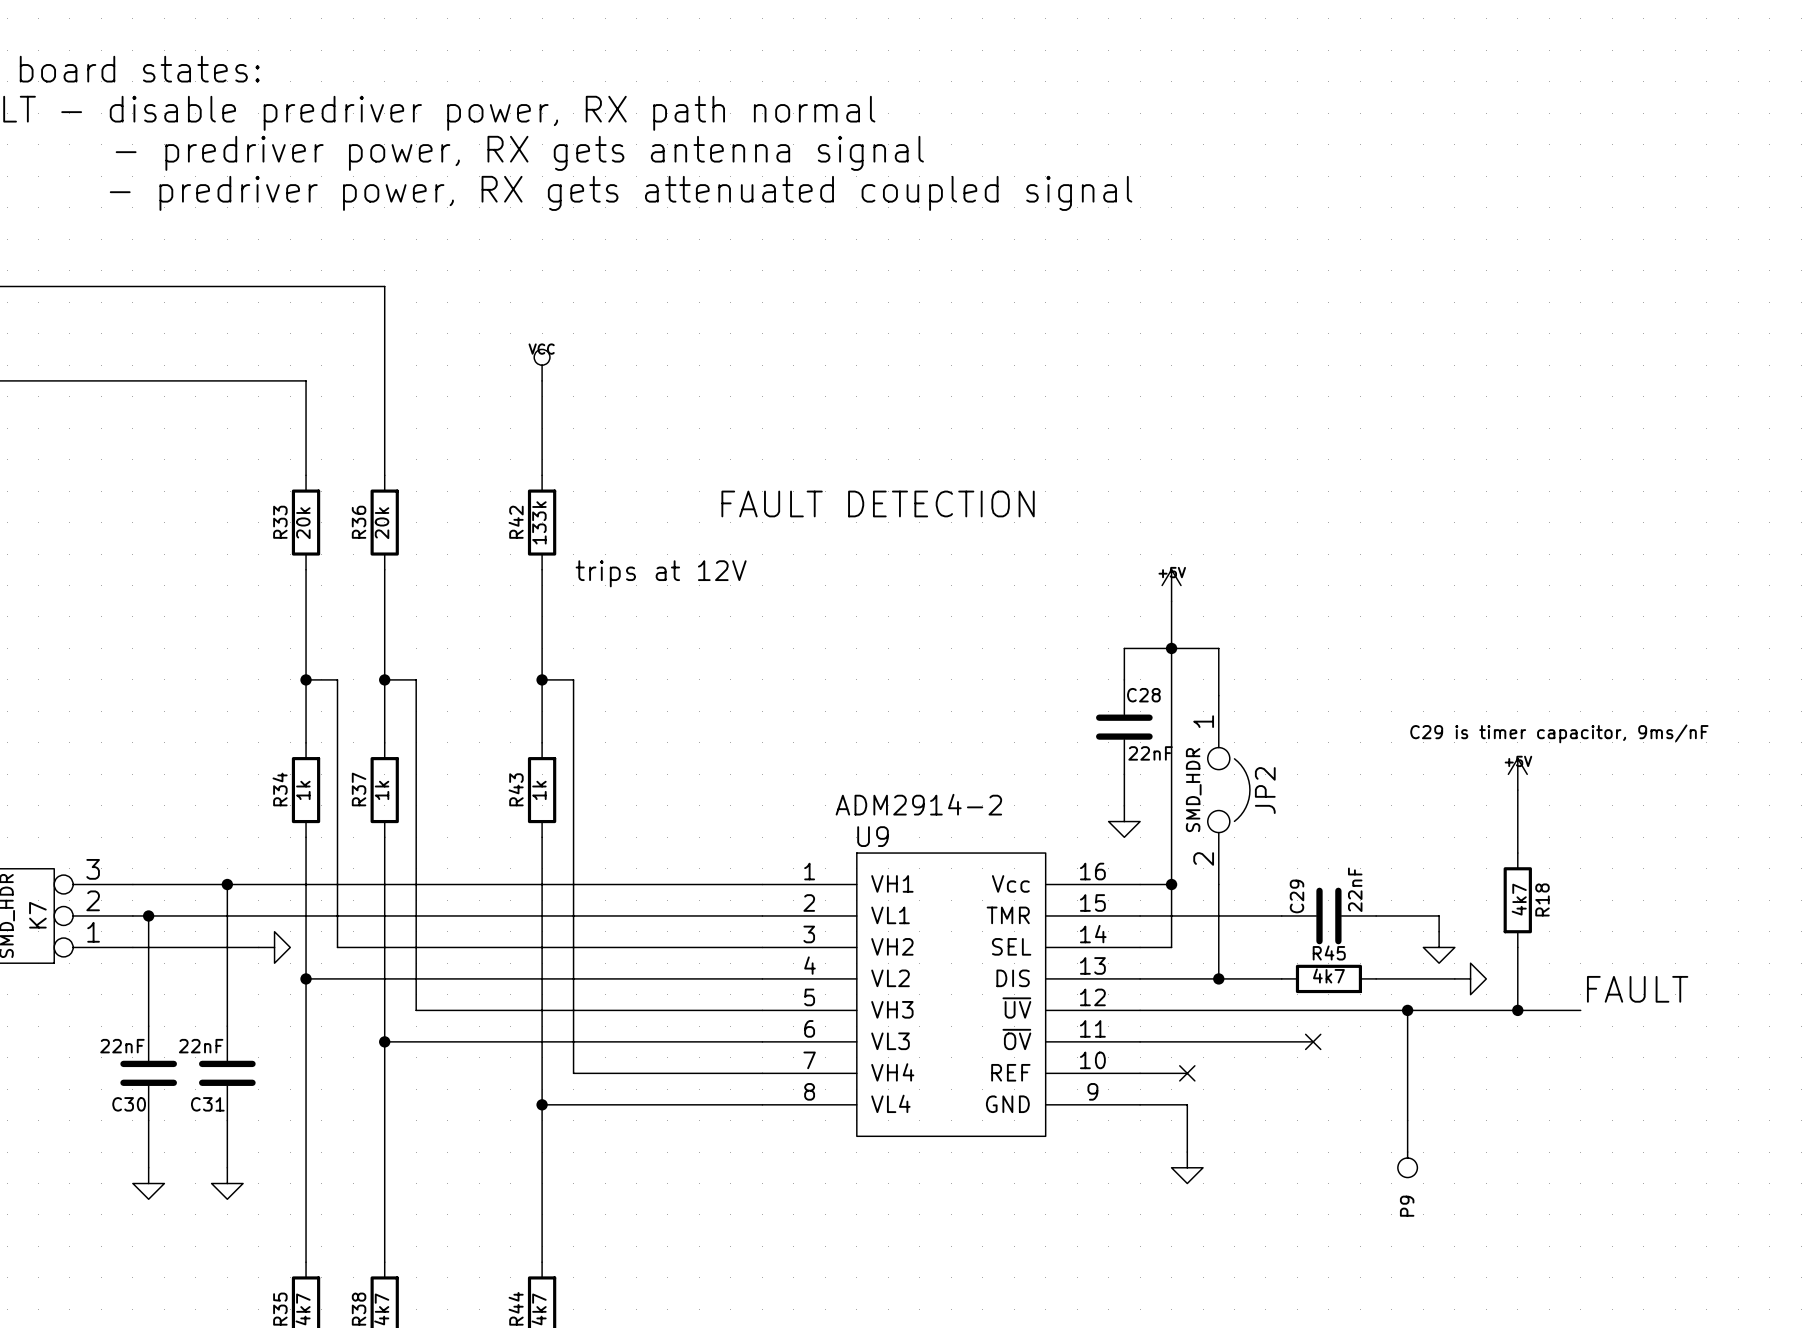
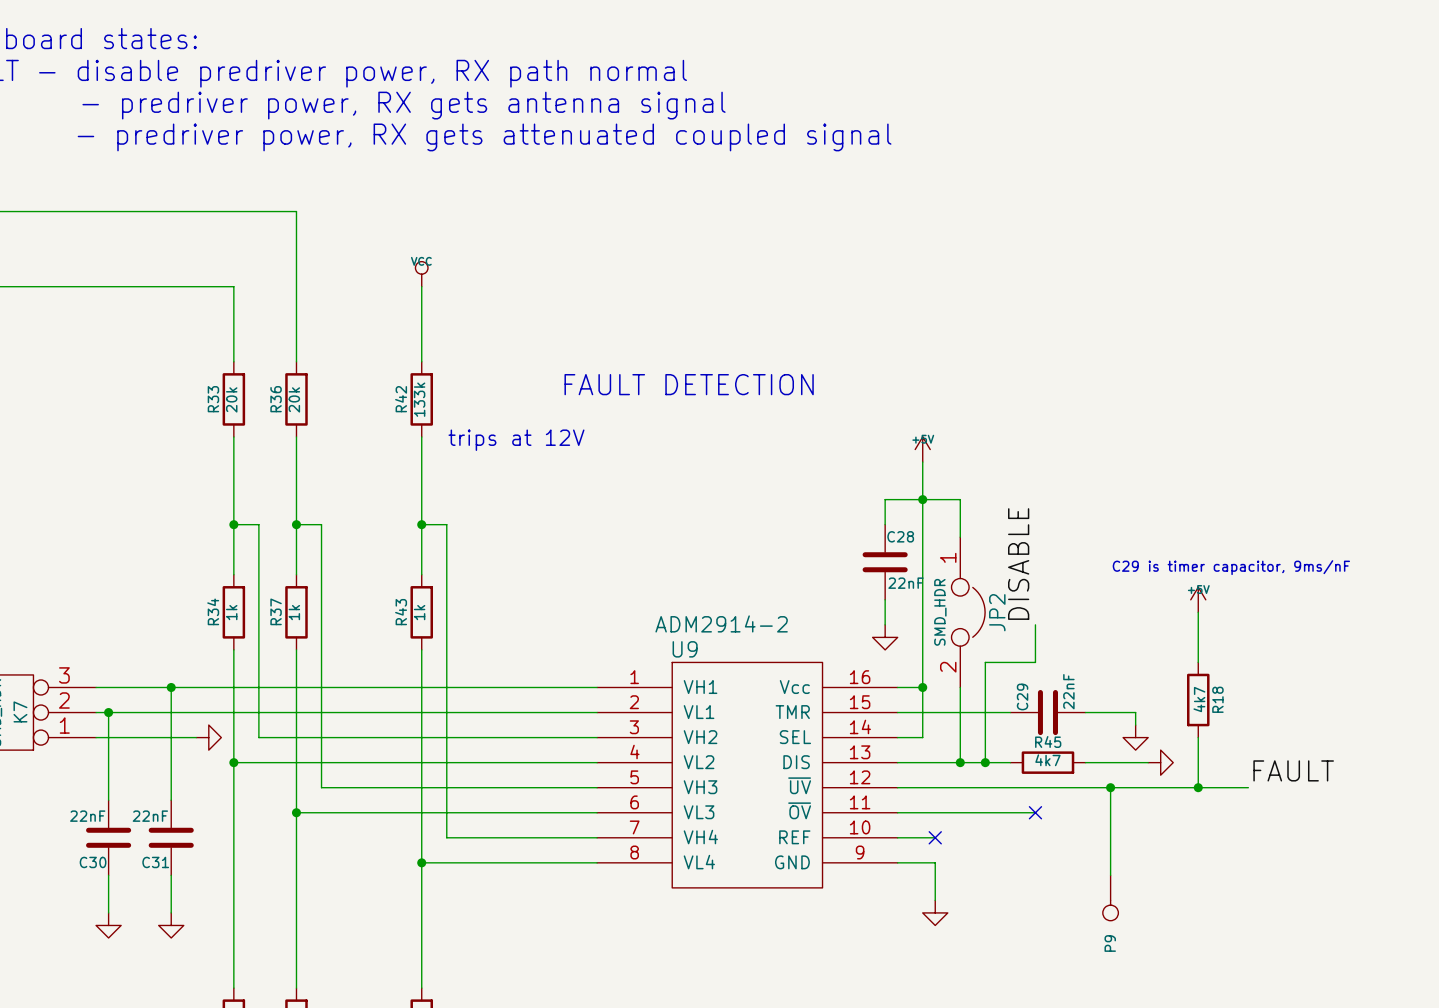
label: none -> DISABLE (1018, 564)
wire: none -> (1035, 624) (1035, 662) (985, 662) (985, 762)
junction: none -> (985, 762)

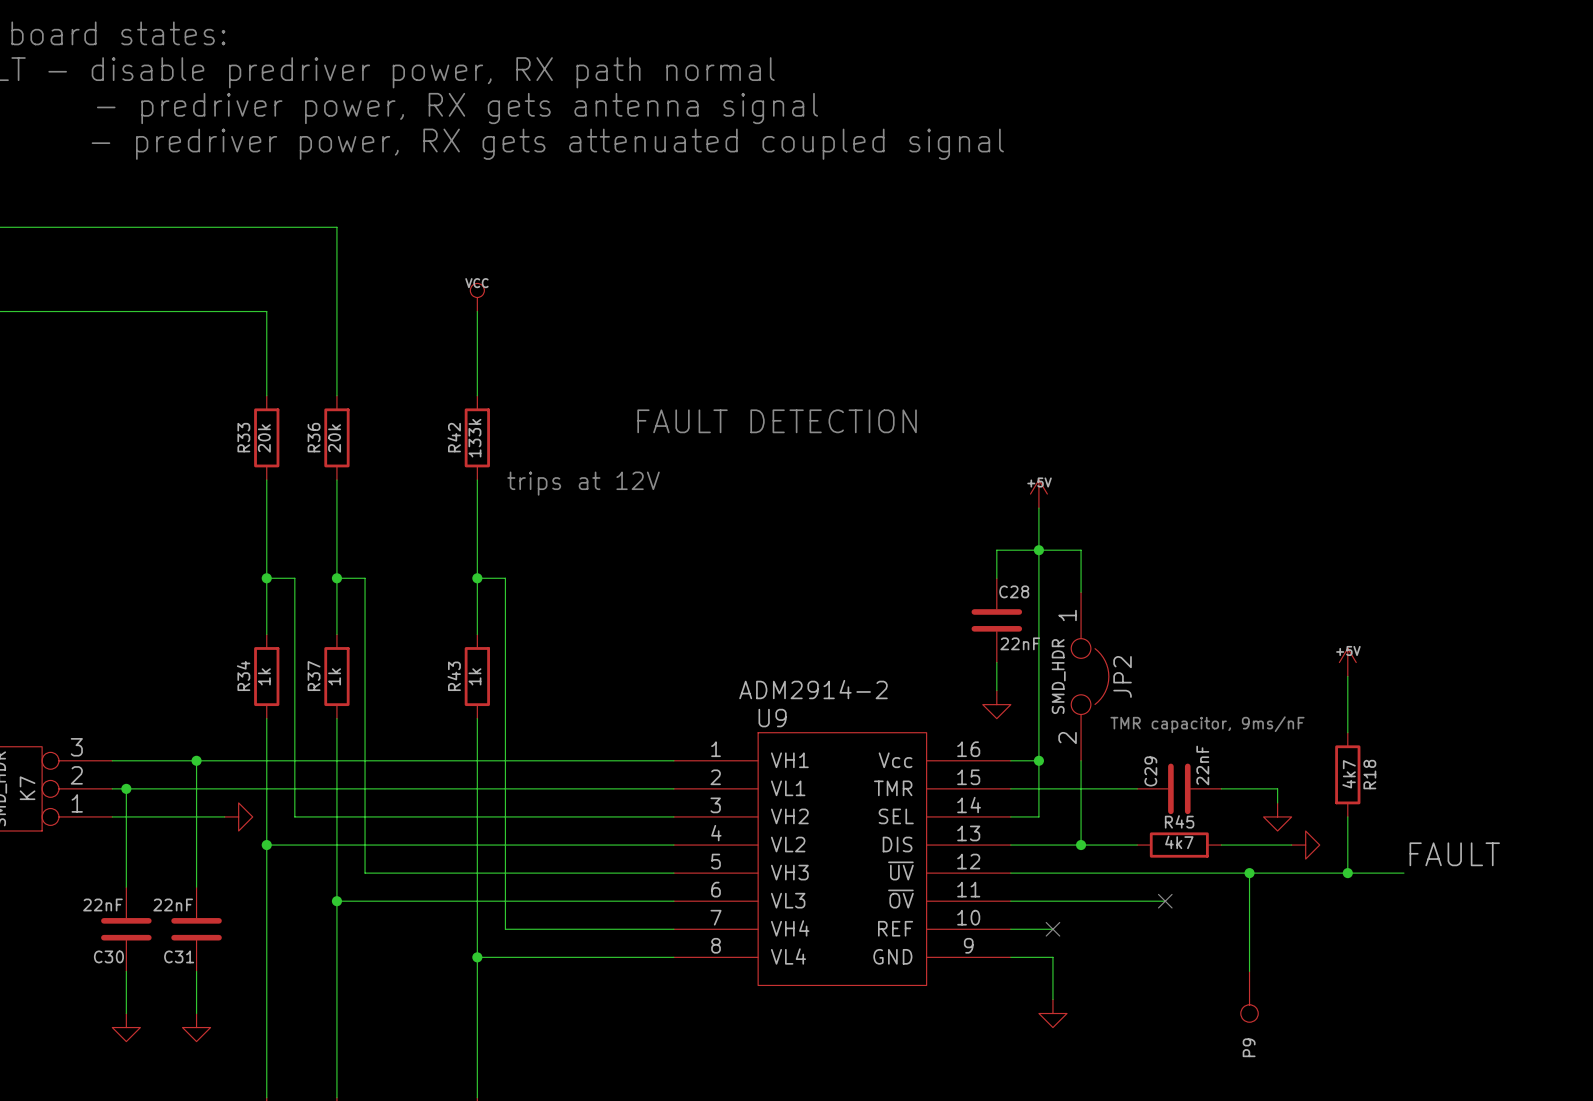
label: DISABLE (1018, 564) -> none
text: C29 is timer capacitor, 9ms/nF (1231, 567) -> none
wire: (1035, 624) (1035, 662) (985, 662) (985, 762) -> none
text: none -> TMR capacitor, 9ms/nF (1207, 724)
junction: (985, 762) -> none

